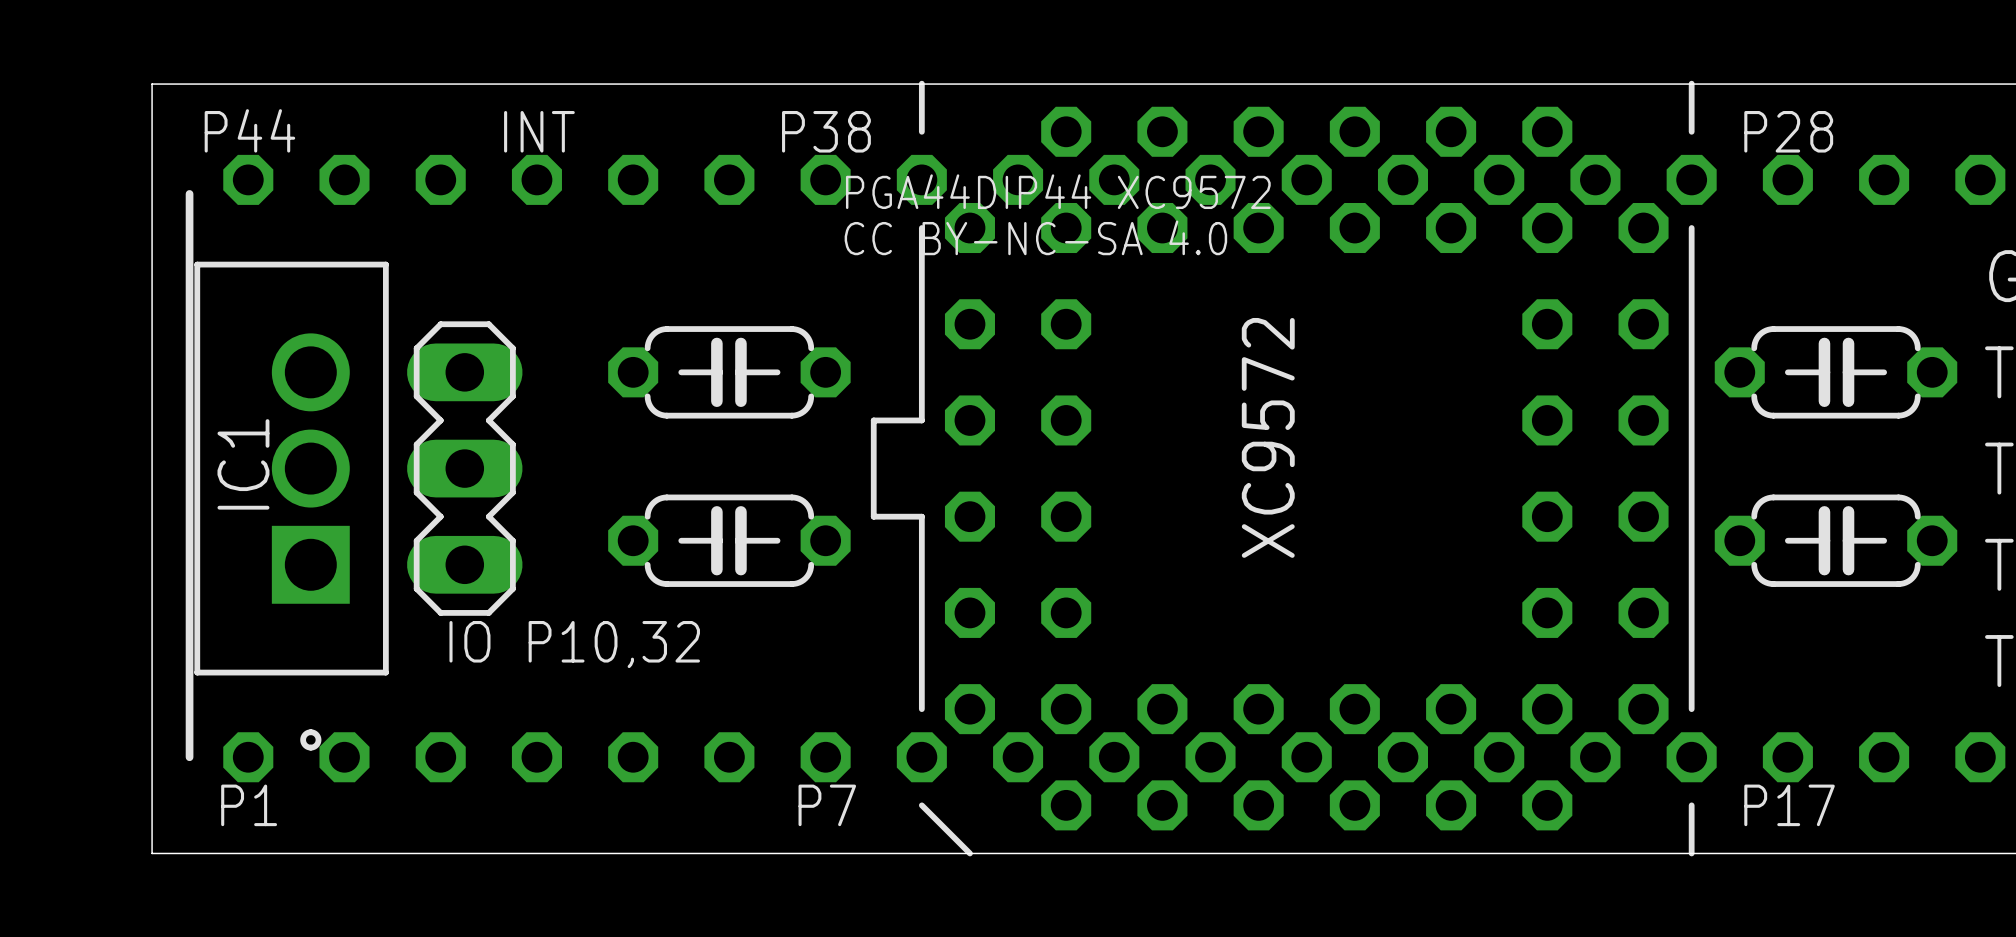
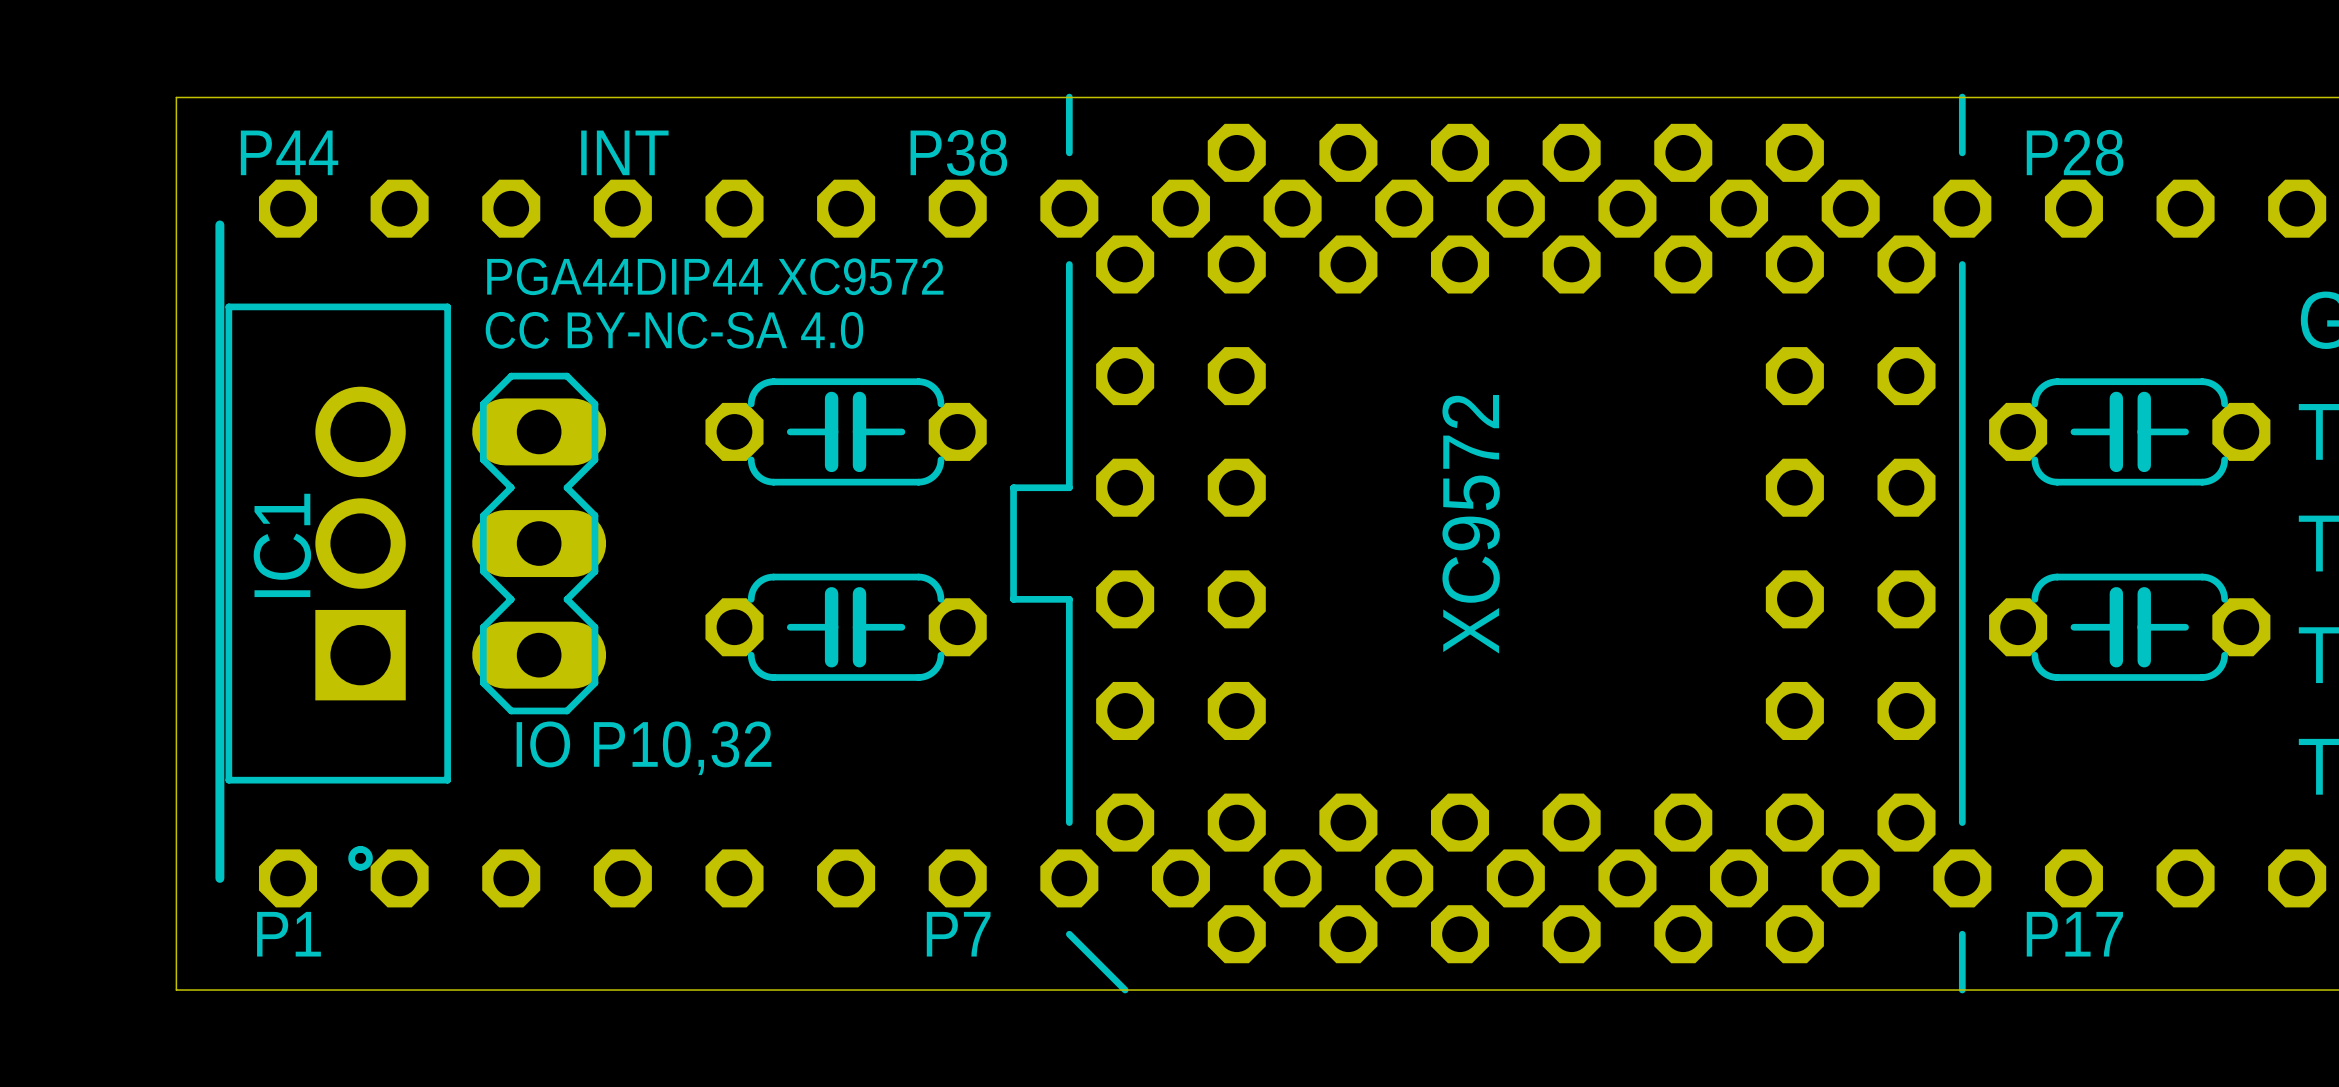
text: PGA44DIP44 XC9572 (1058, 191) -> none
text: CC BY-NC-SA 4.0 (1035, 237) -> PGA44DIP44 XC9572 (715, 276)
text: none -> CC BY-NC-SA 4.0 (674, 330)

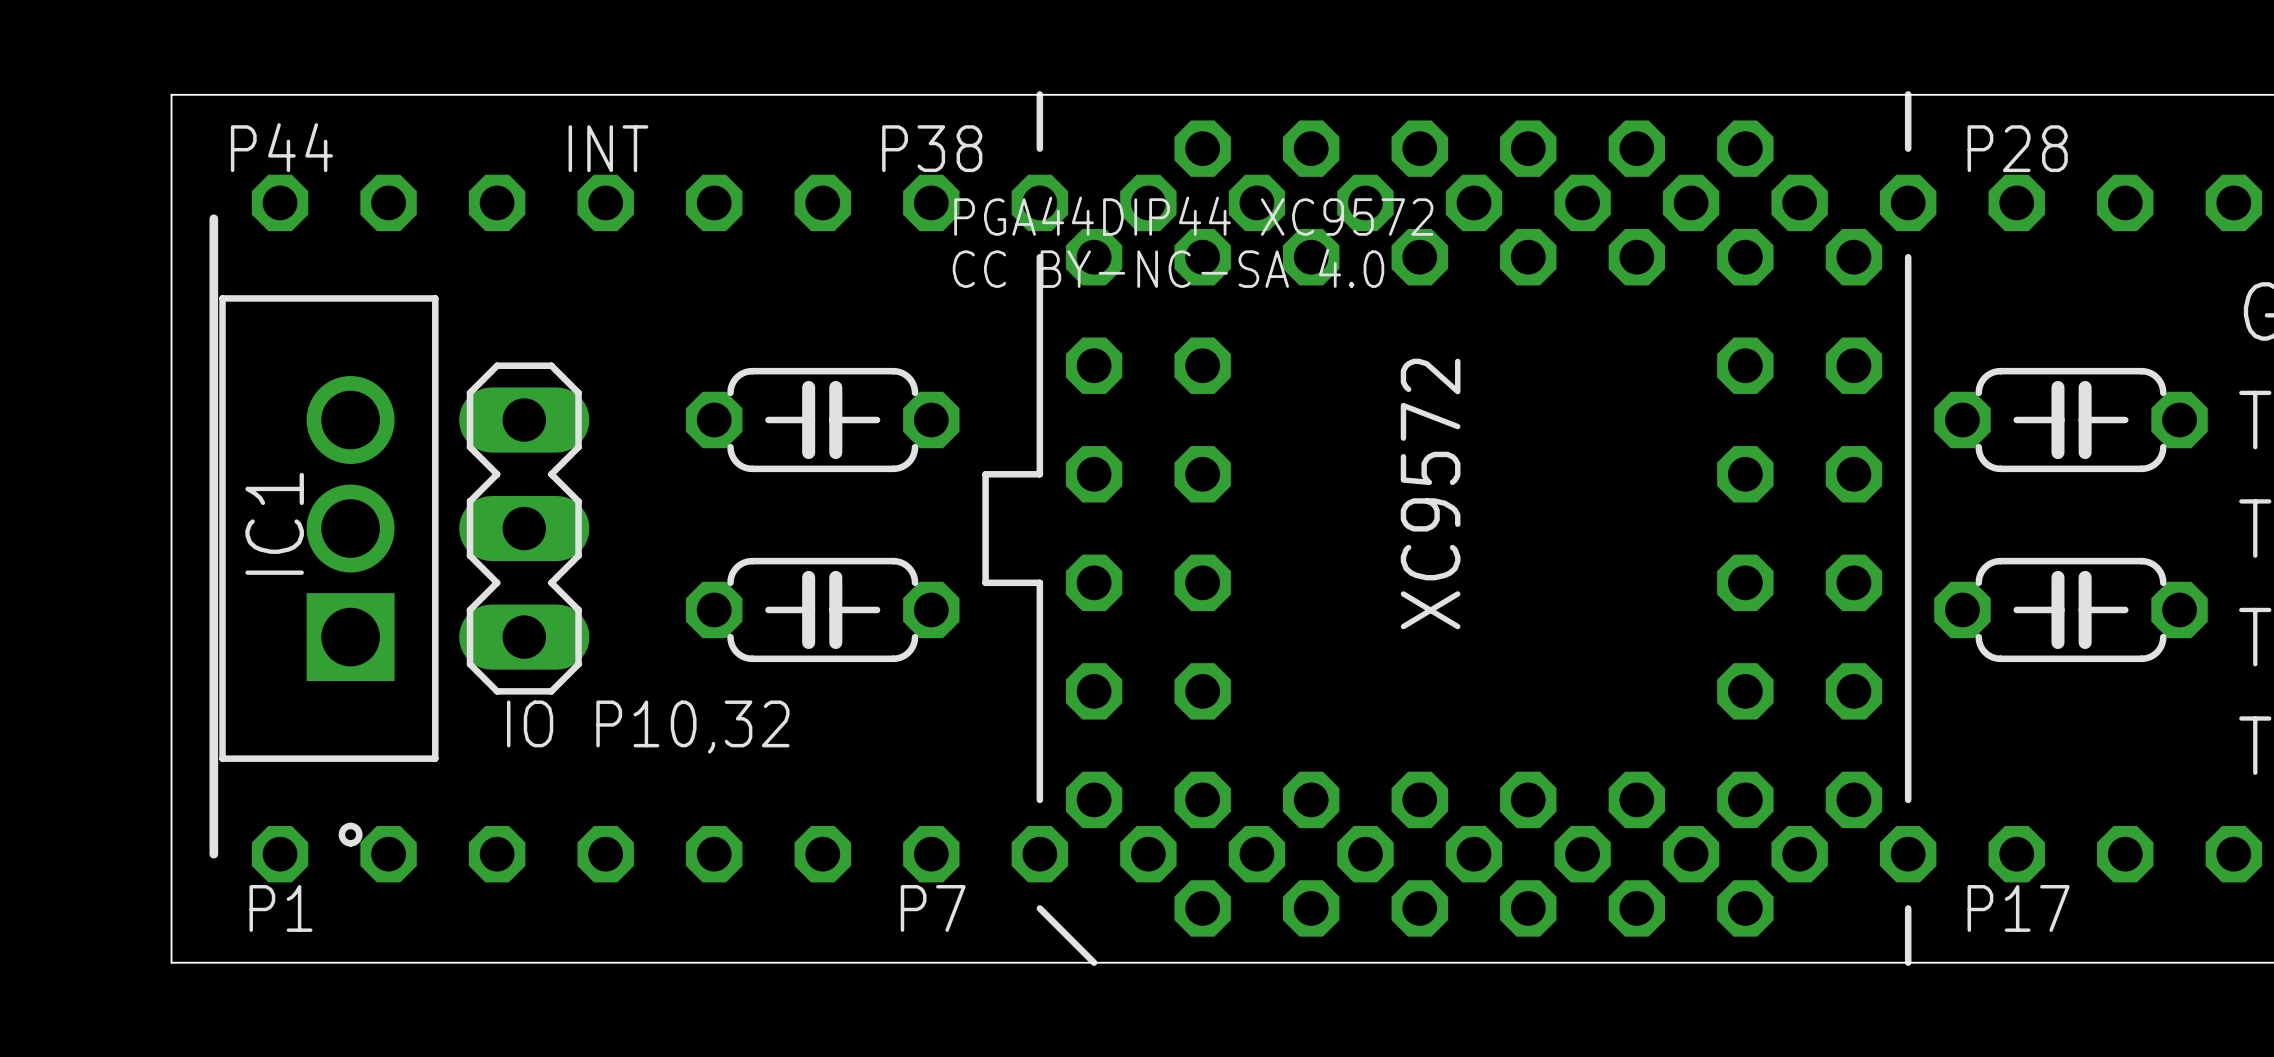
text: none -> PGA44DIP44 XC9572 (1193, 216)
text: PGA44DIP44 XC9572 (715, 276) -> CC BY-NC-SA 4.0 (1168, 268)
text: CC BY-NC-SA 4.0 (674, 330) -> none

